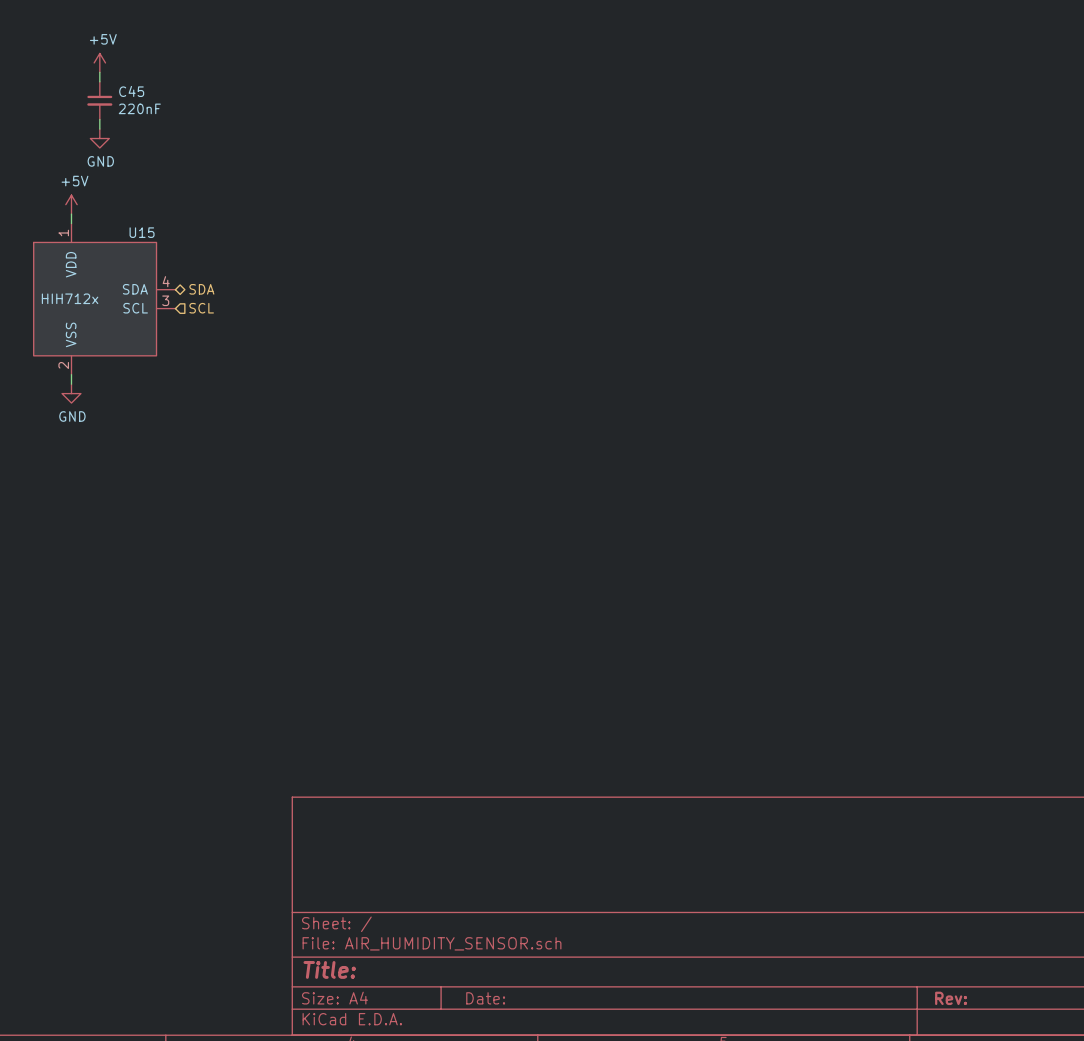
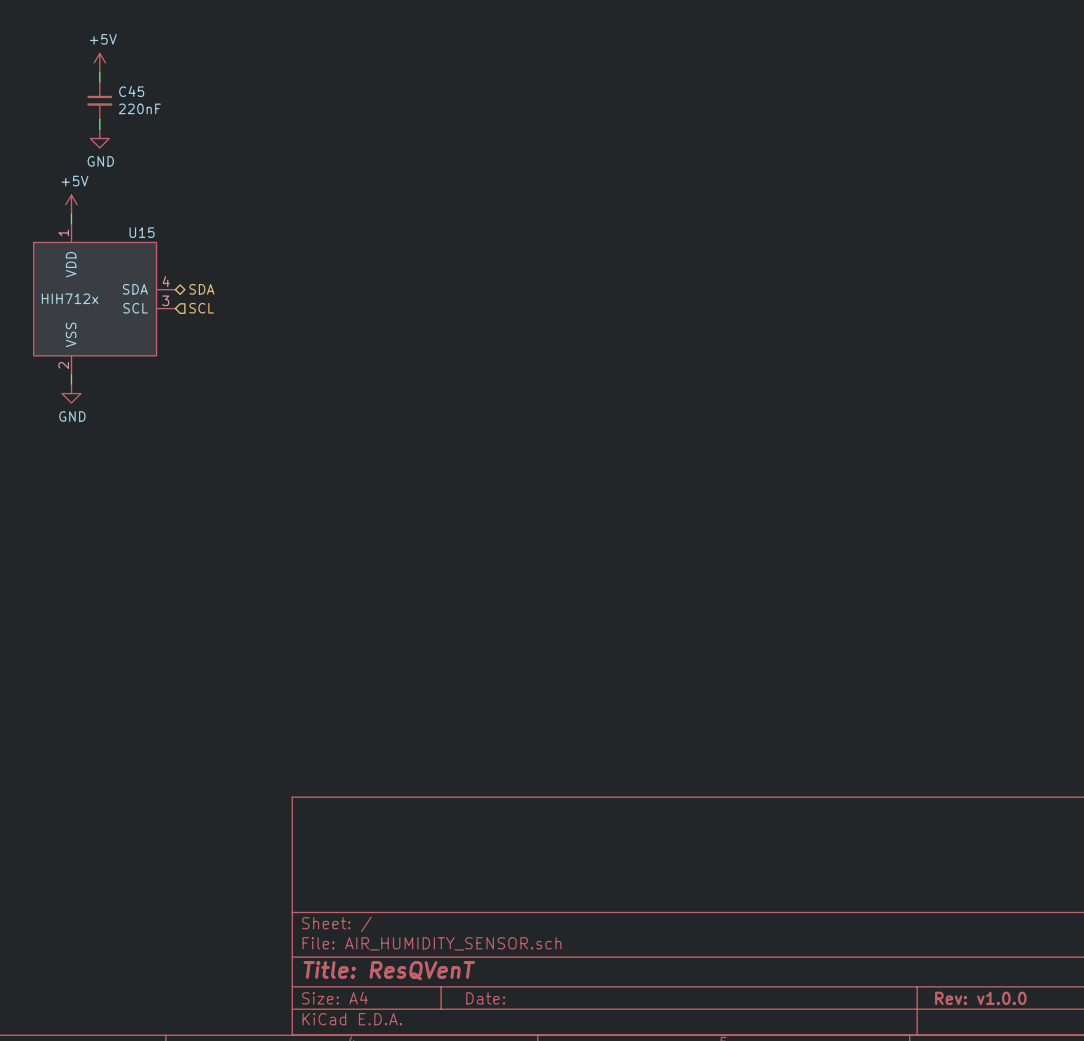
title block: Title: (329, 969) -> Title: ResQVenT (389, 970)
title block: Rev: (951, 998) -> Rev: v1.0.0 (980, 998)

